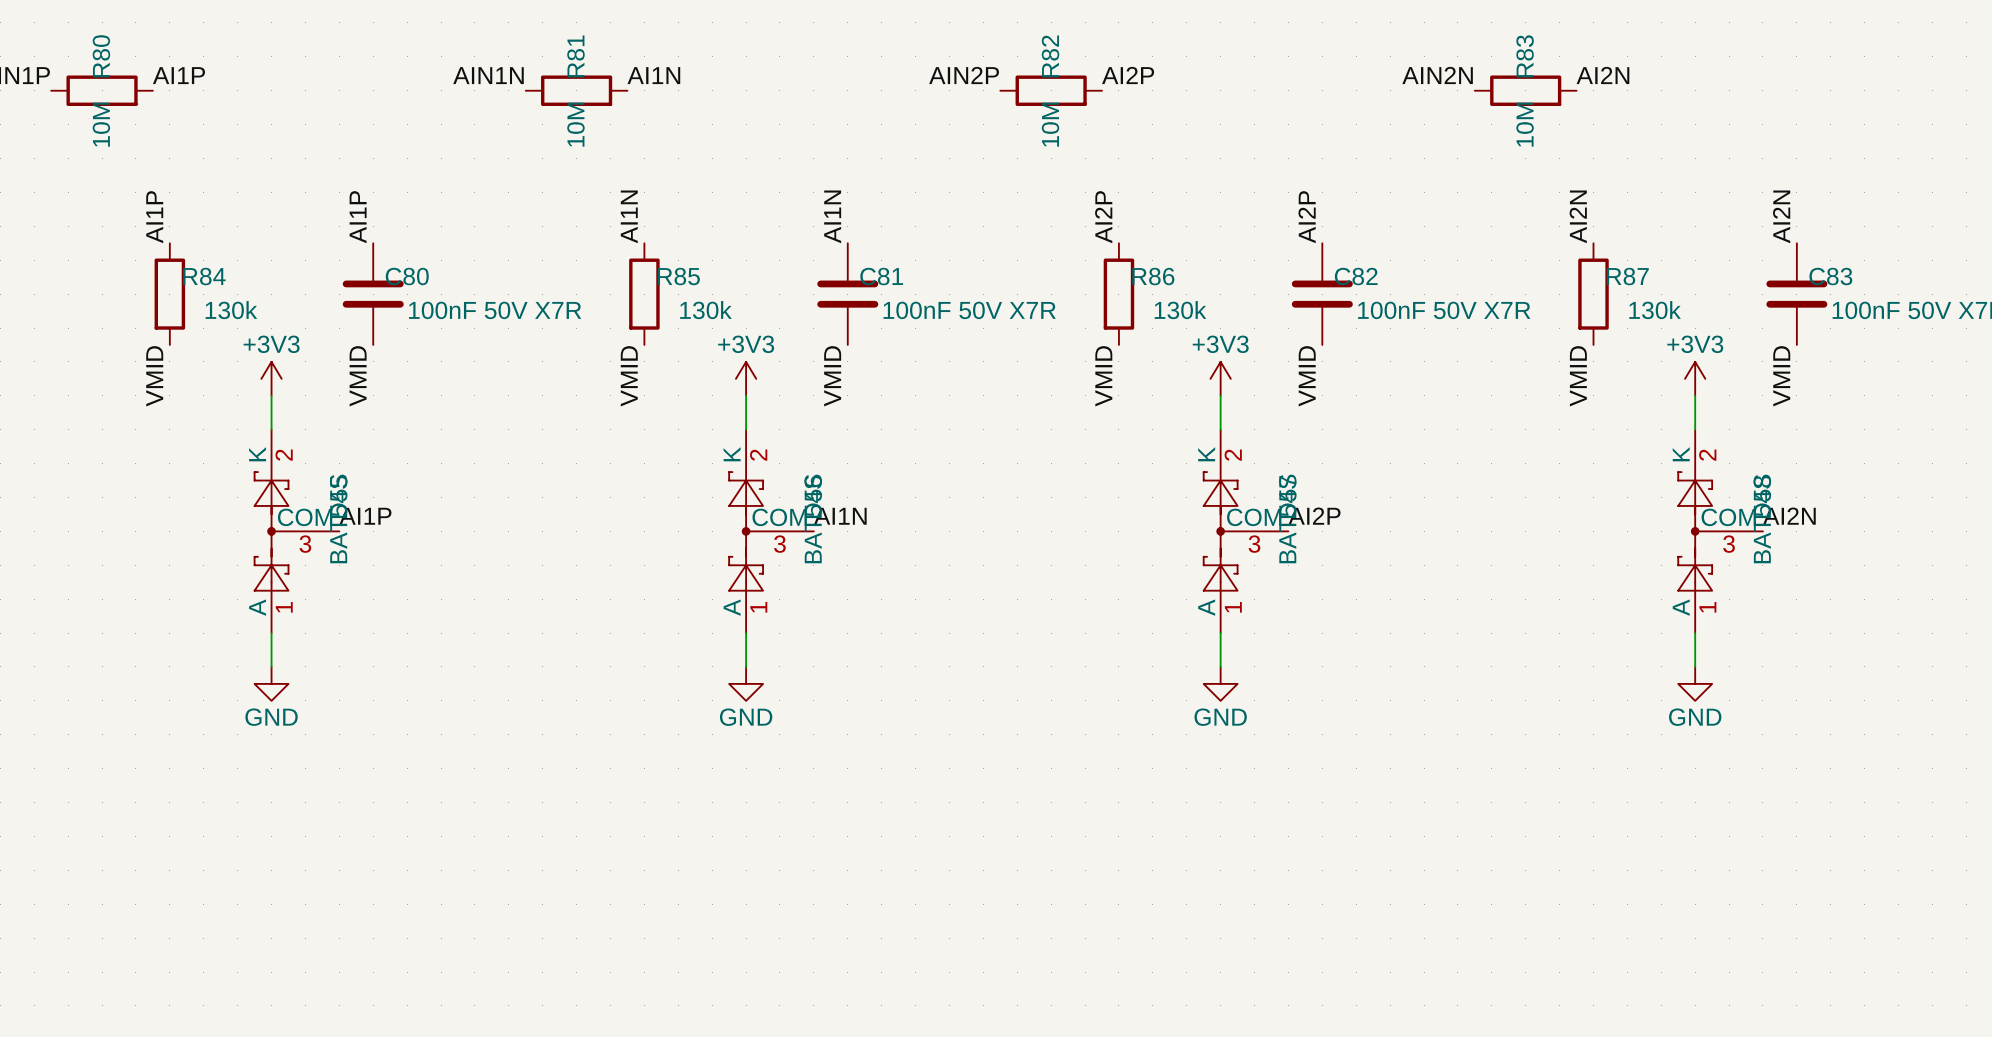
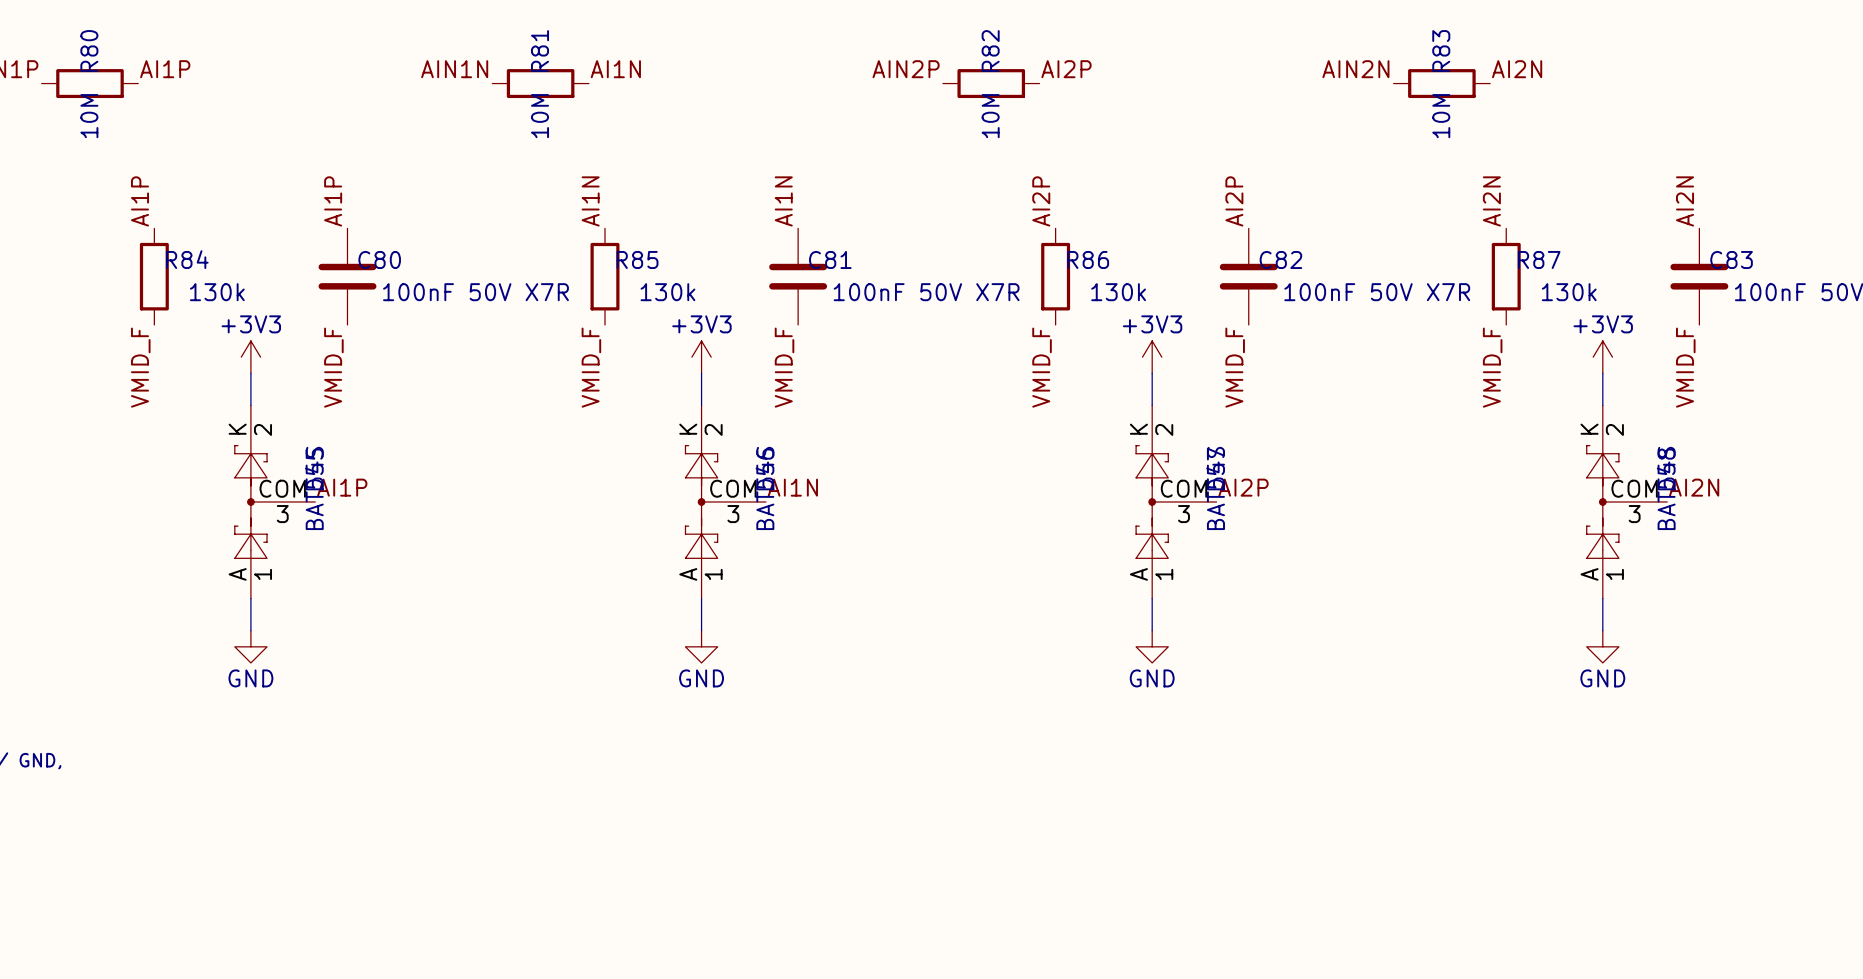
label: VMID (154, 376) -> VMID_F (140, 367)
label: VMID (358, 376) -> VMID_F (333, 367)
label: VMID (629, 376) -> VMID_F (591, 367)
label: VMID (832, 376) -> VMID_F (784, 367)
label: VMID (1103, 376) -> VMID_F (1042, 367)
label: VMID (1307, 376) -> VMID_F (1235, 367)
label: VMID (1578, 376) -> VMID_F (1492, 367)
label: VMID (1781, 376) -> VMID_F (1685, 367)

